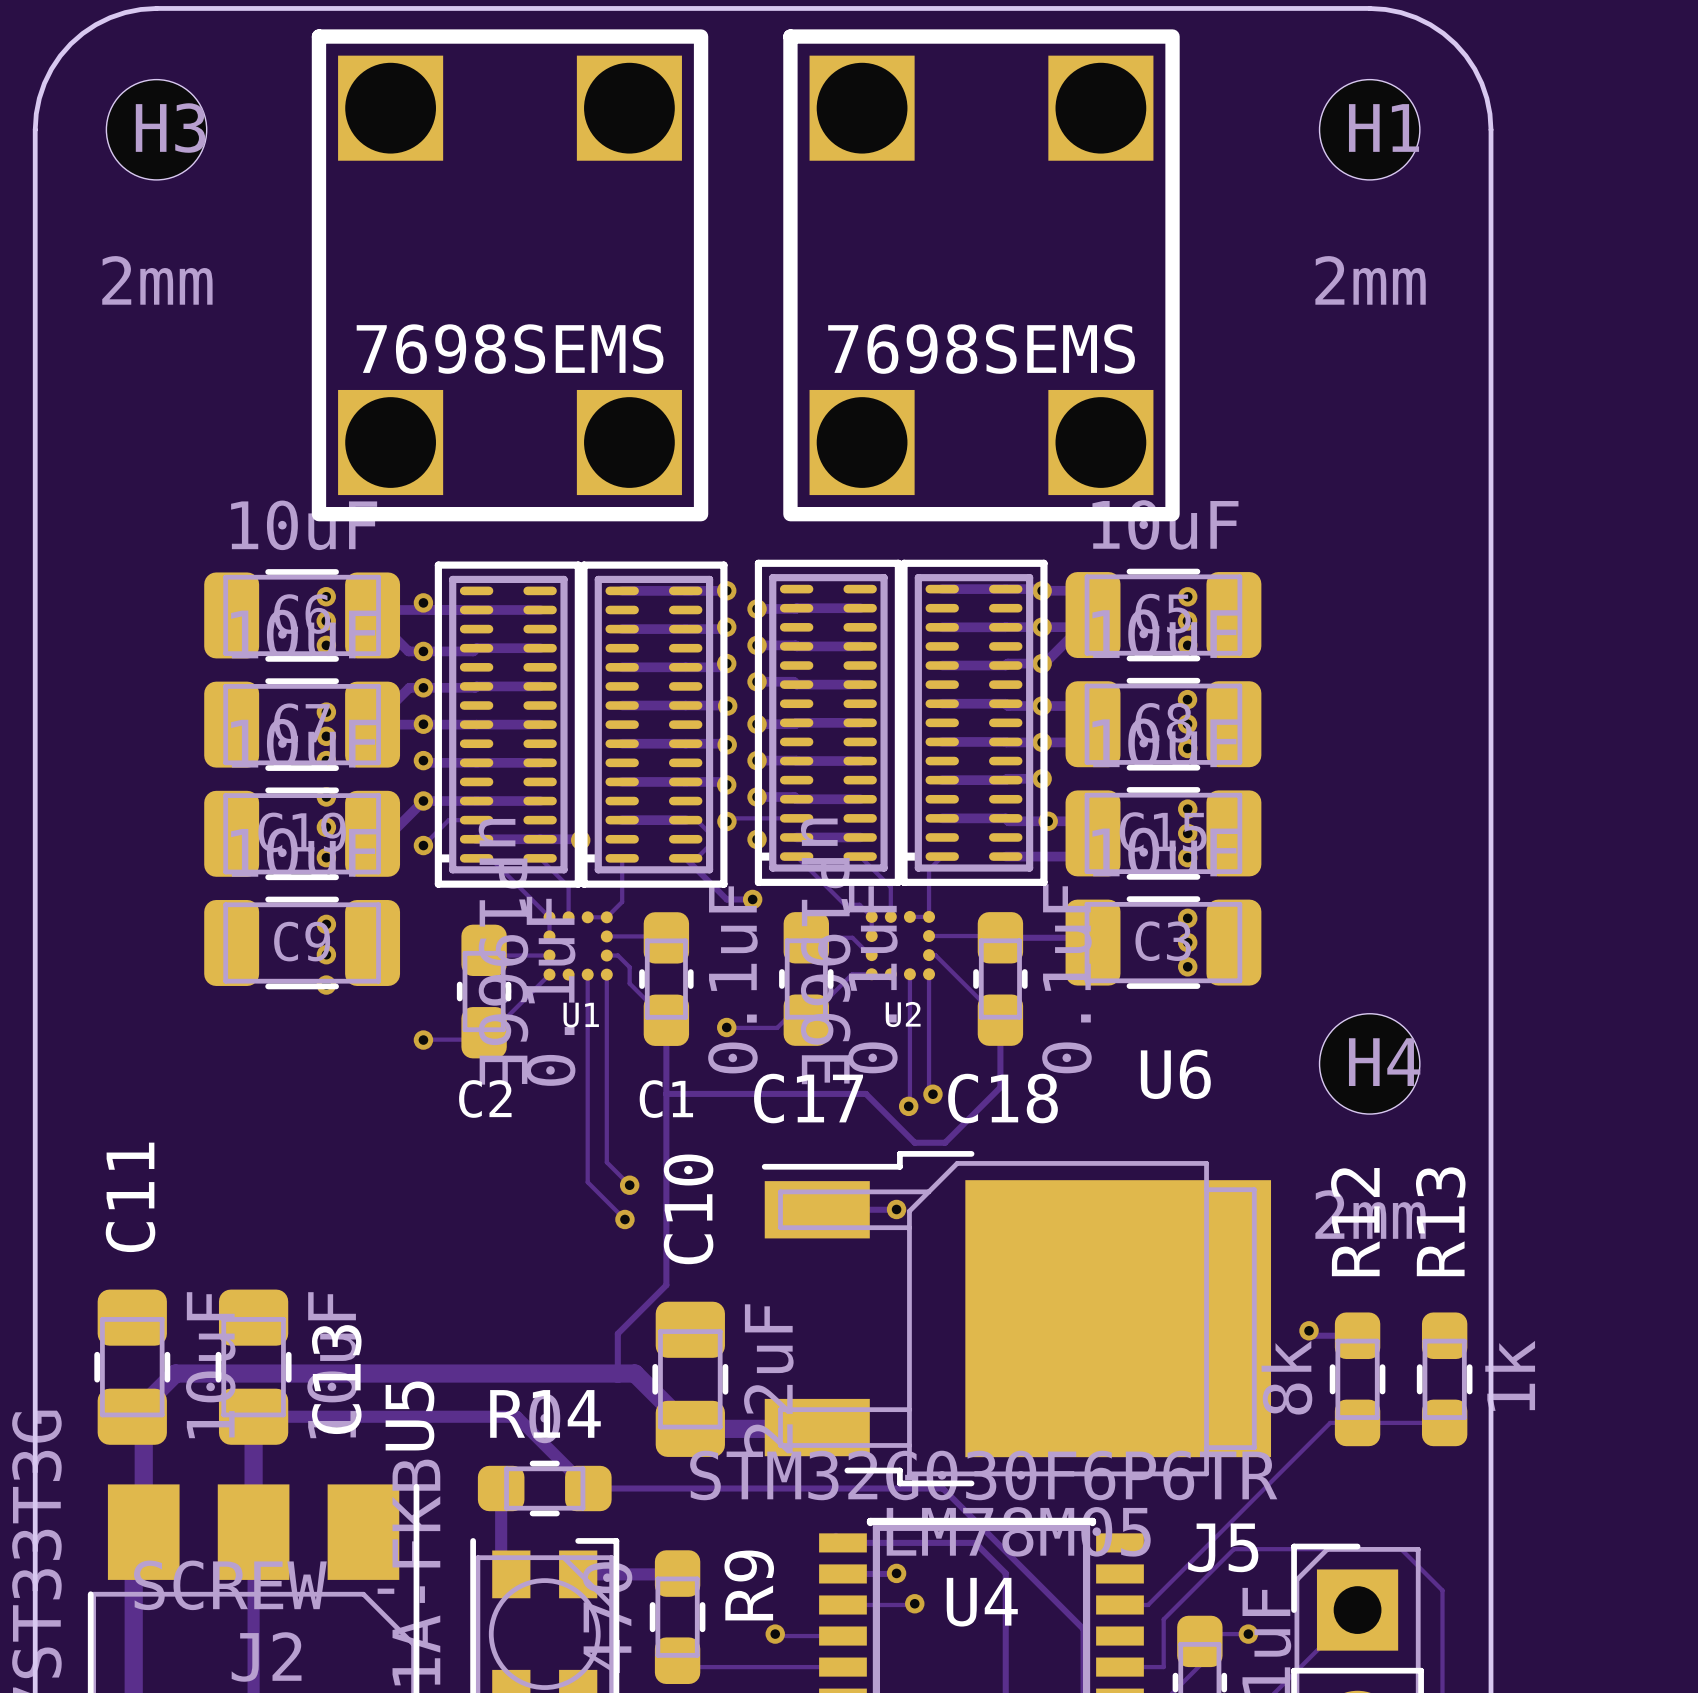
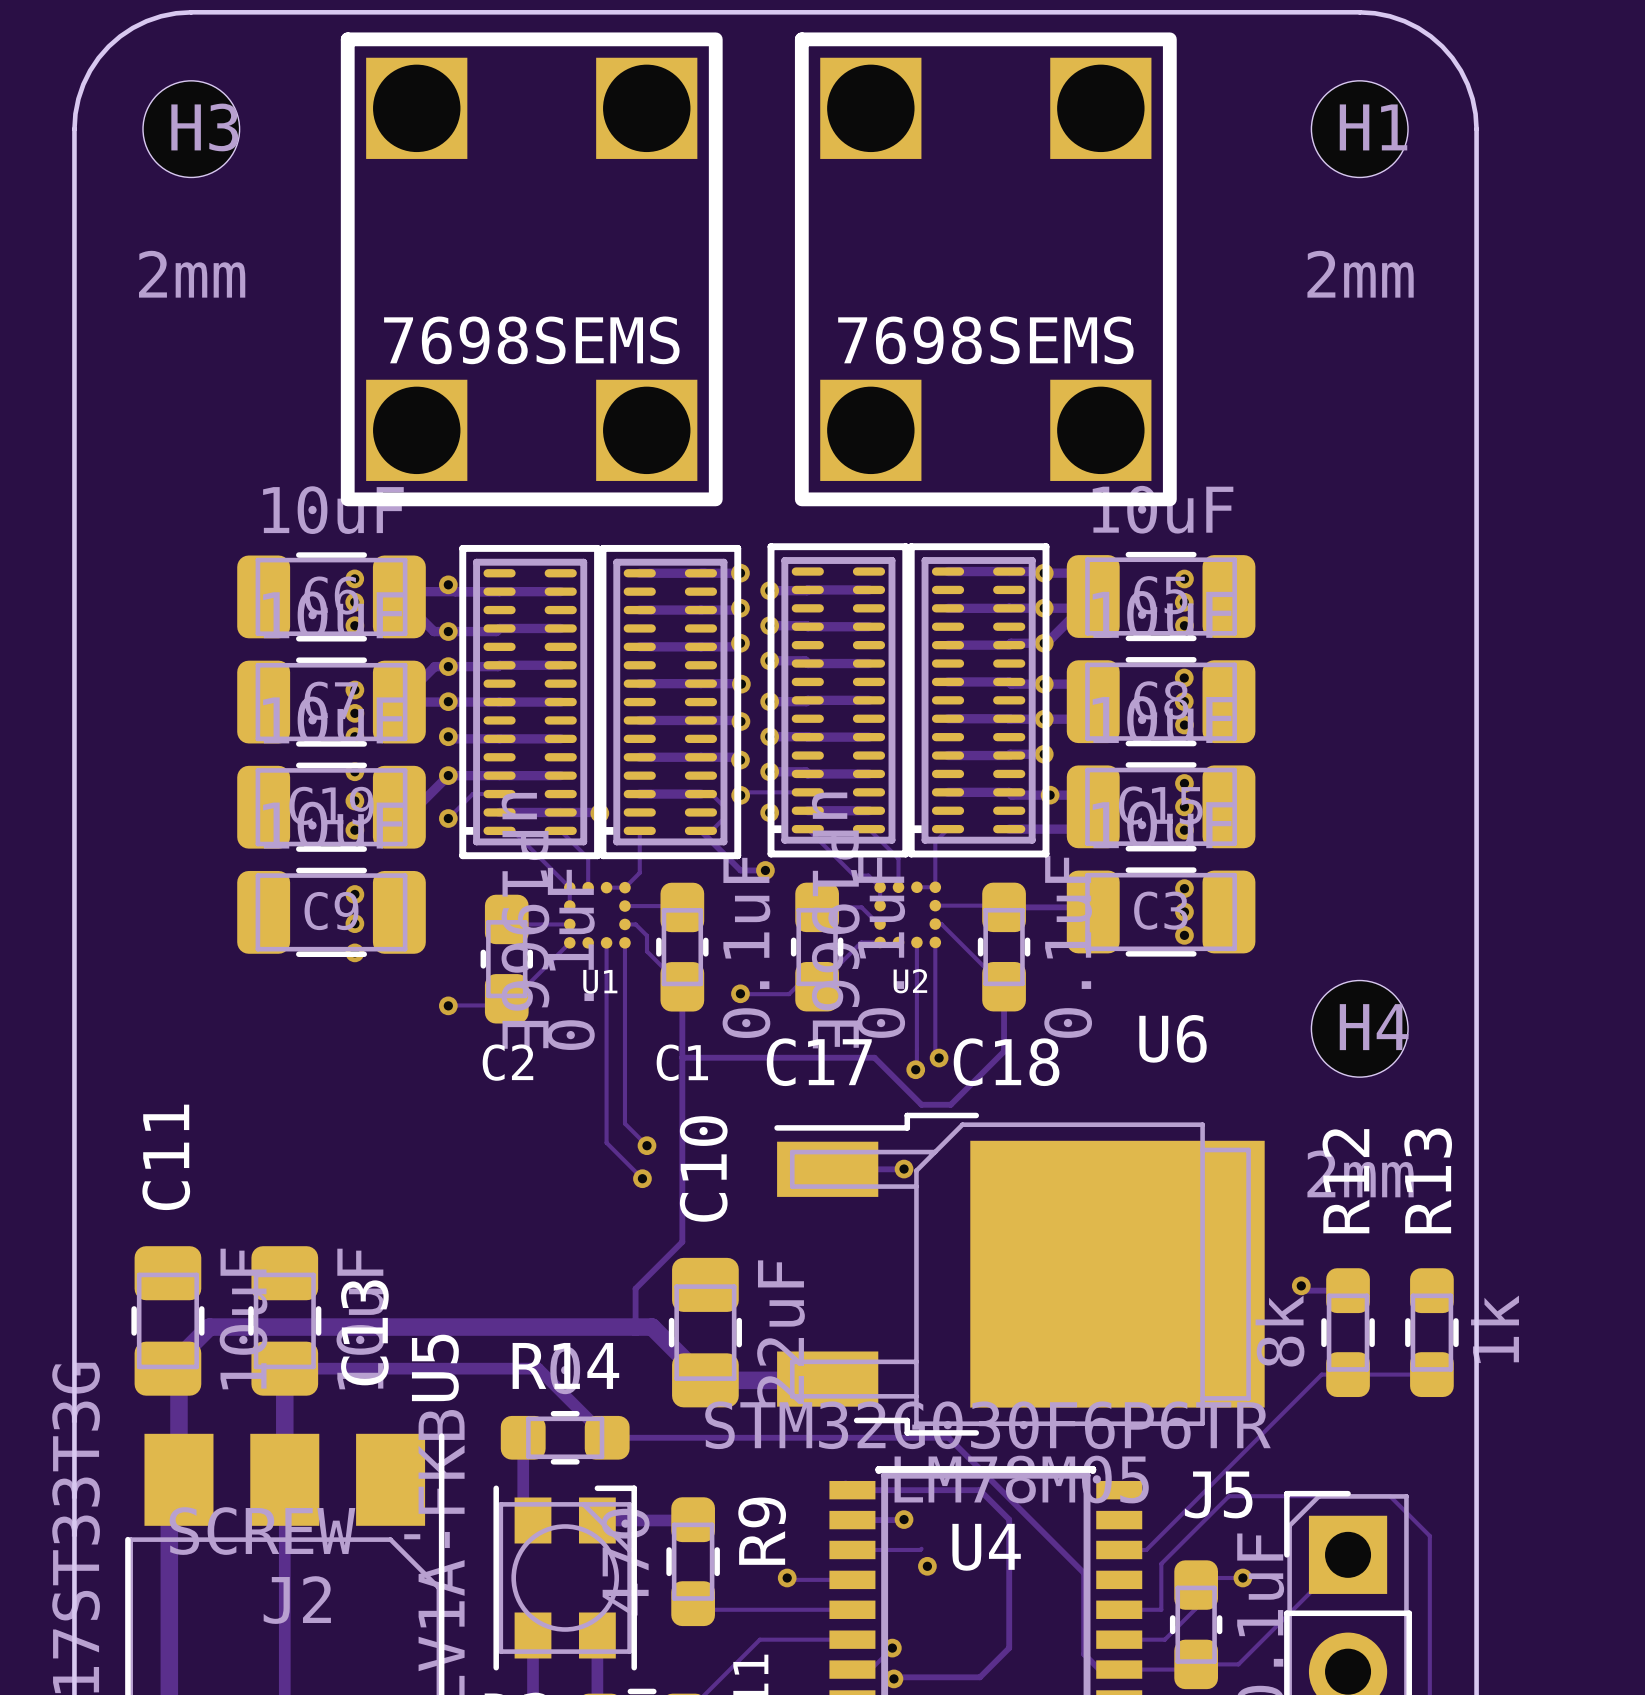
via position: (914, 1603) -> (927, 1566)

